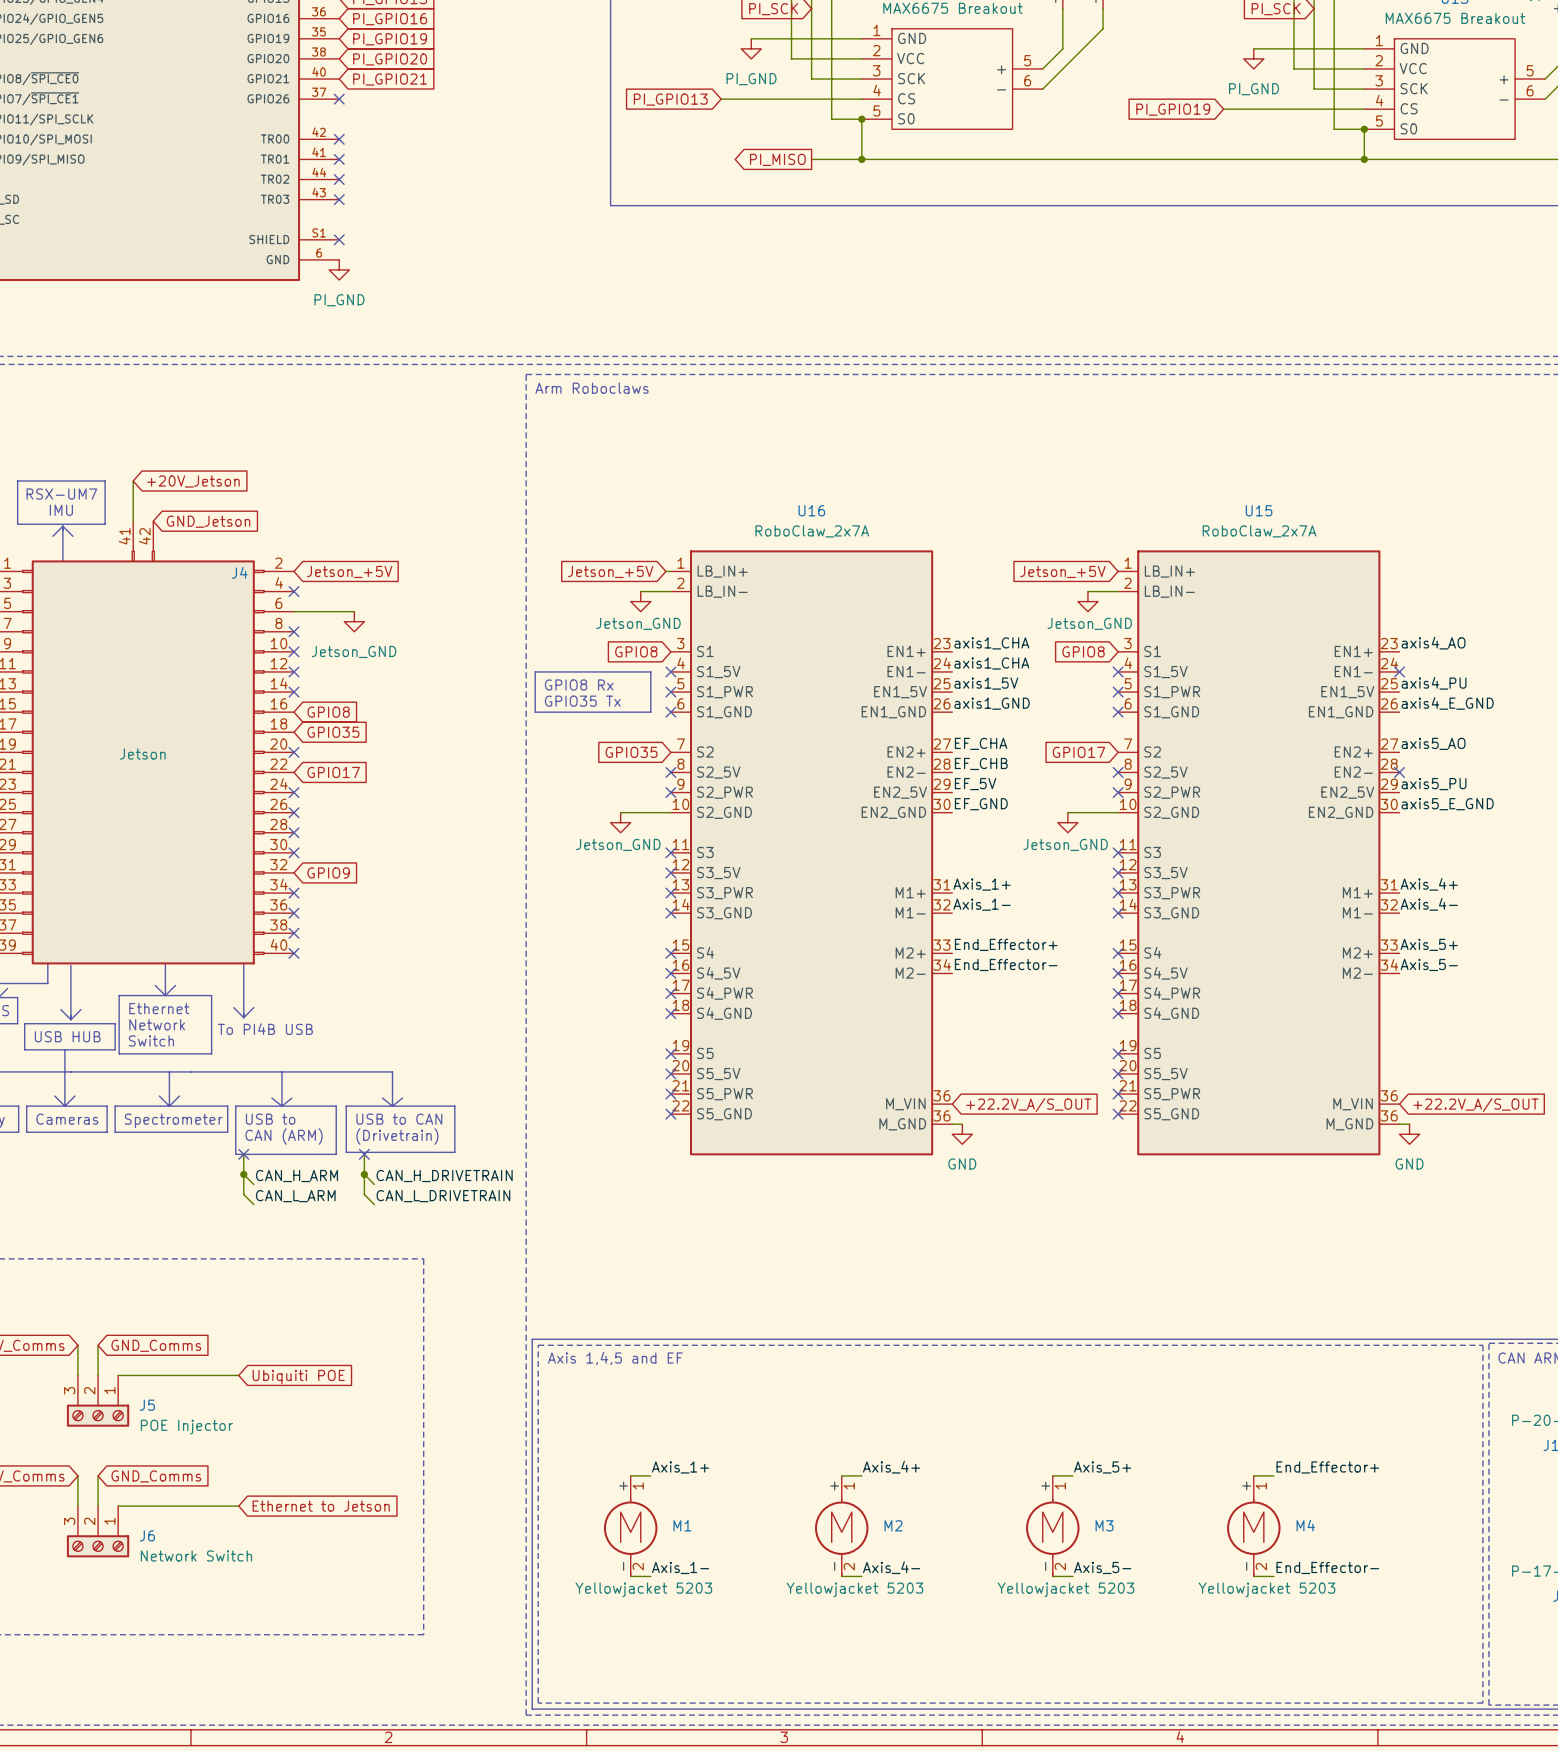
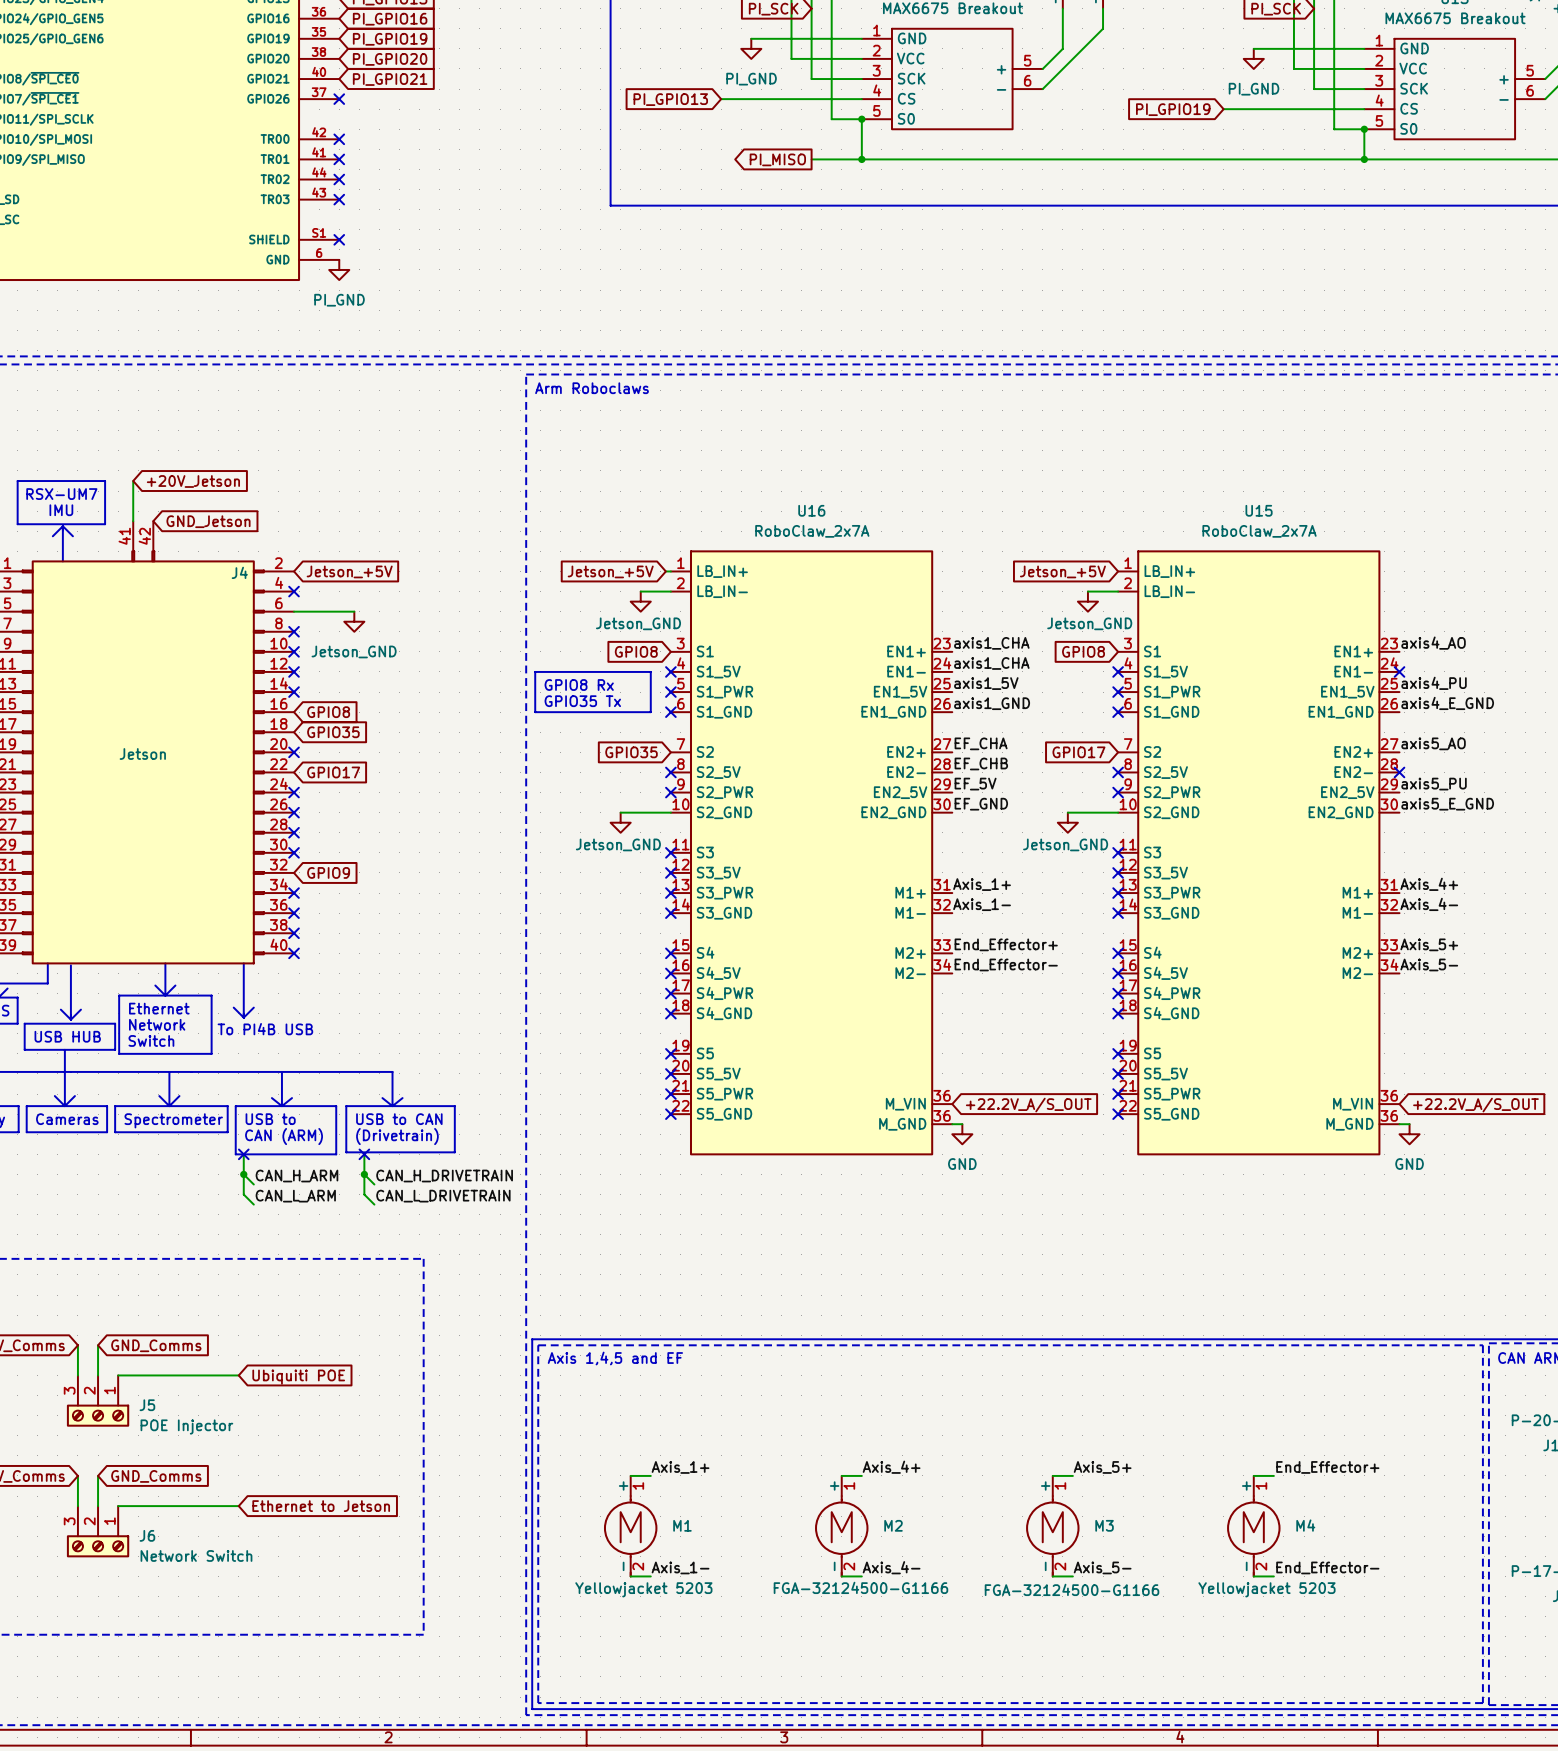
M2 value: Yellowjacket 5203 (854, 1589) -> FGA-32124500-G1166 (860, 1587)
M3 value: Yellowjacket 5203 (1065, 1589) -> FGA-32124500-G1166 (1072, 1589)

